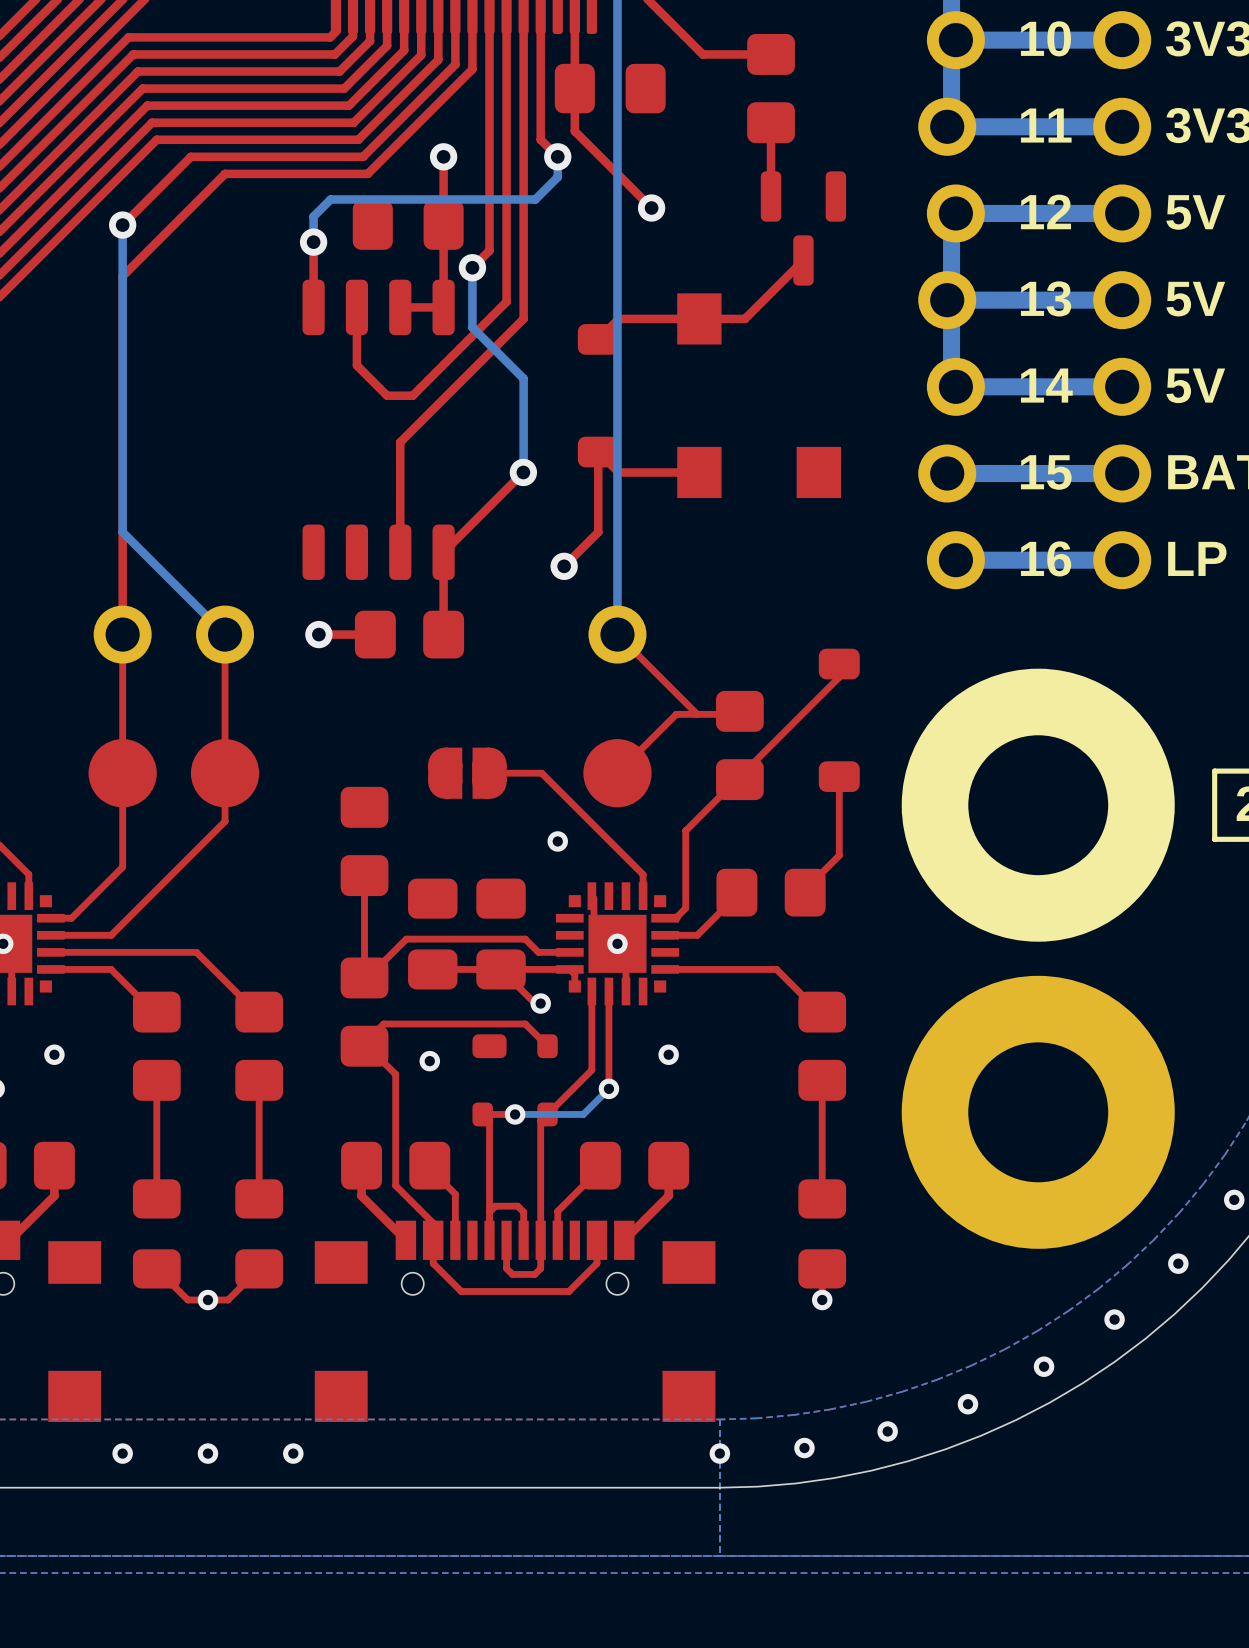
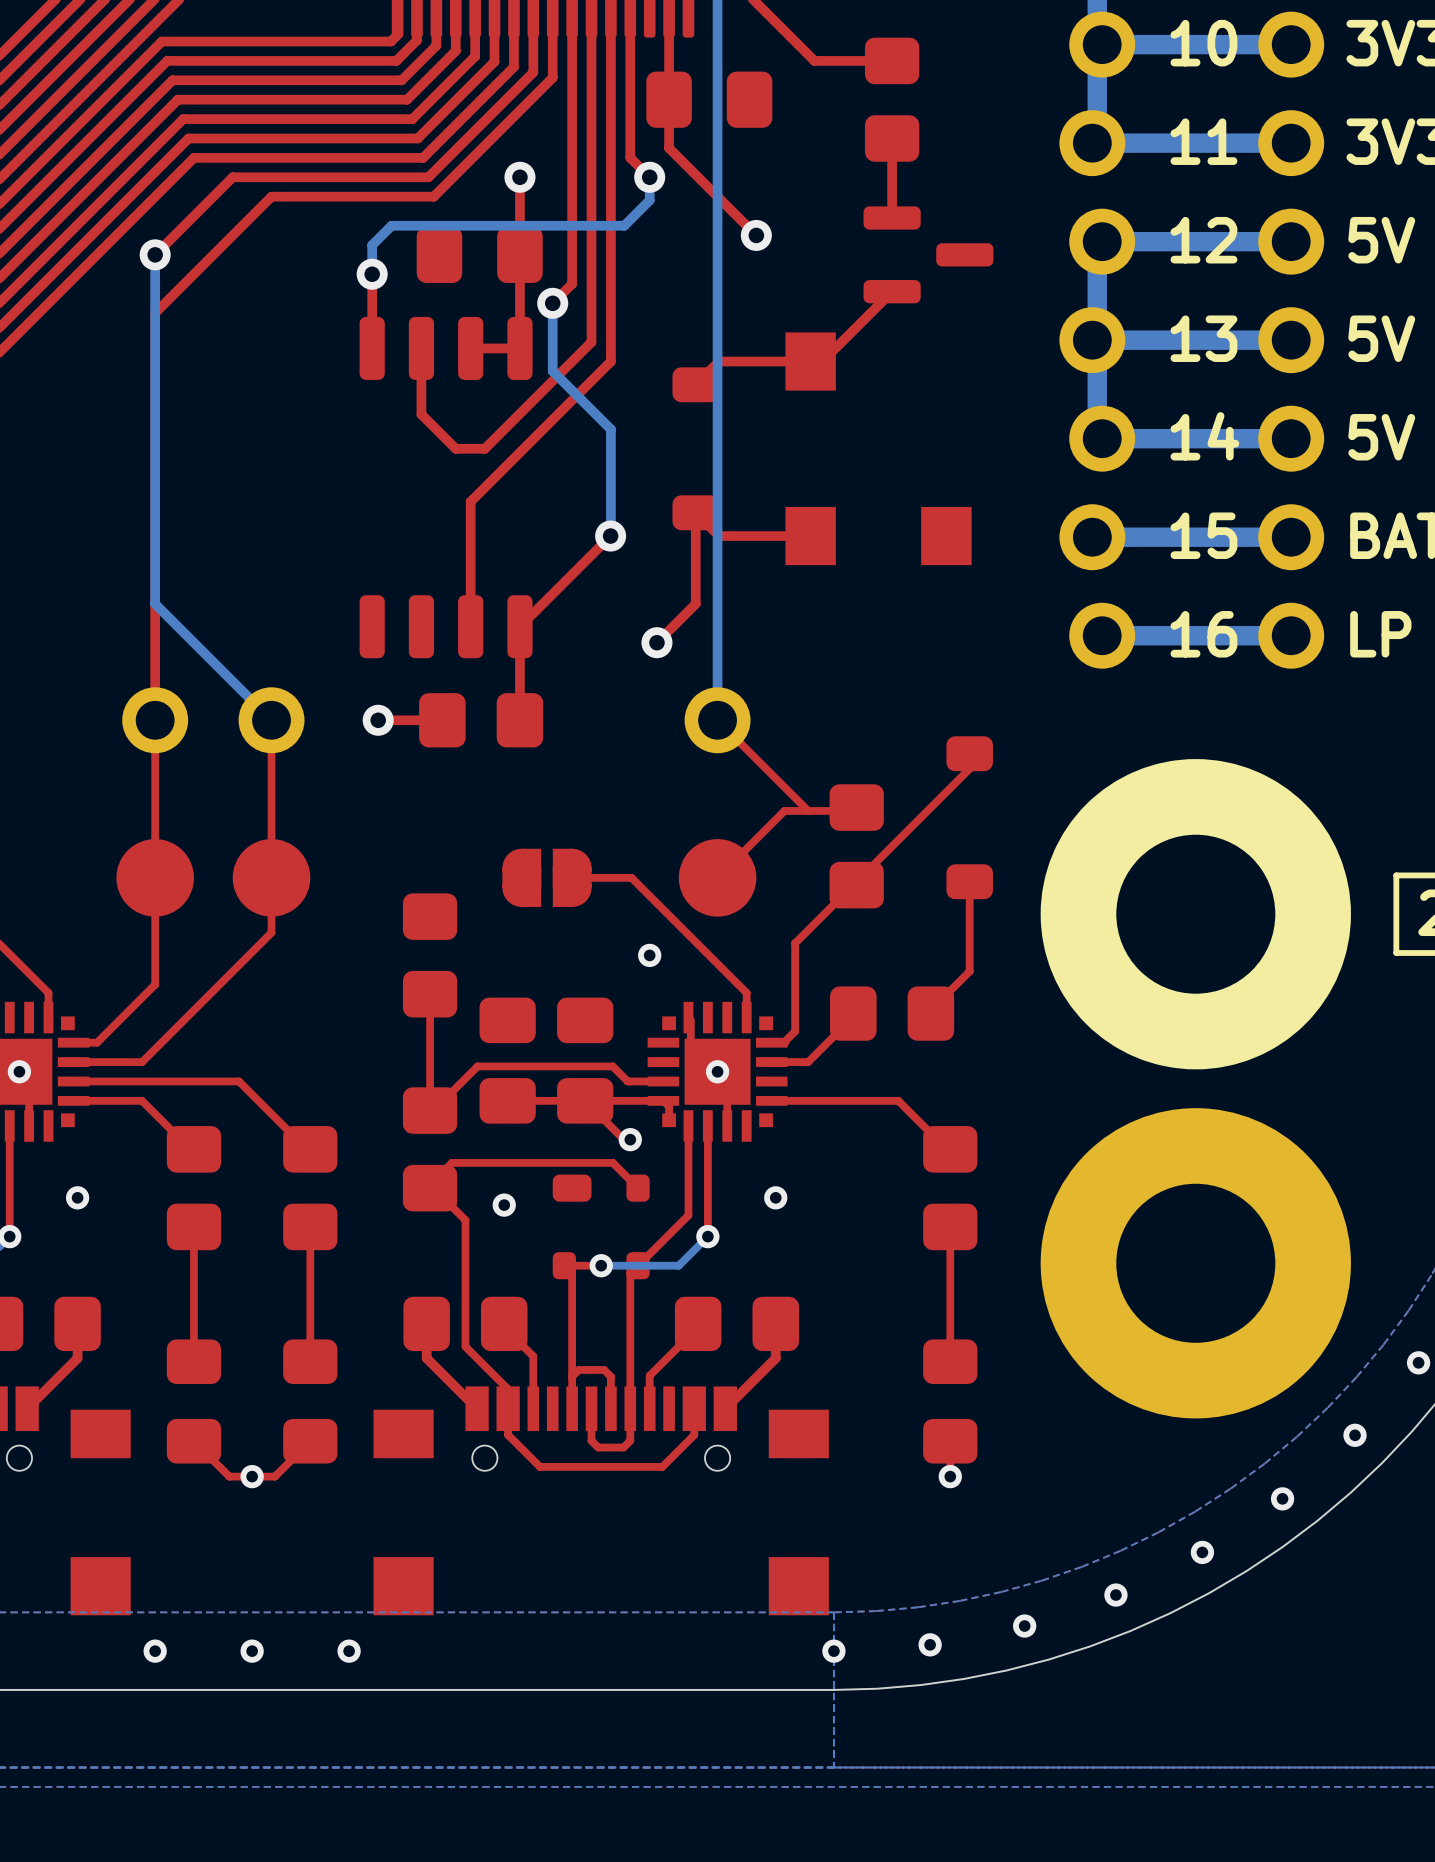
part rotation: 0° (803, 228) -> 90° counterclockwise (928, 254)
top track: (803, 260) (745, 318) (709, 318) -> (892, 291) (822, 361)

